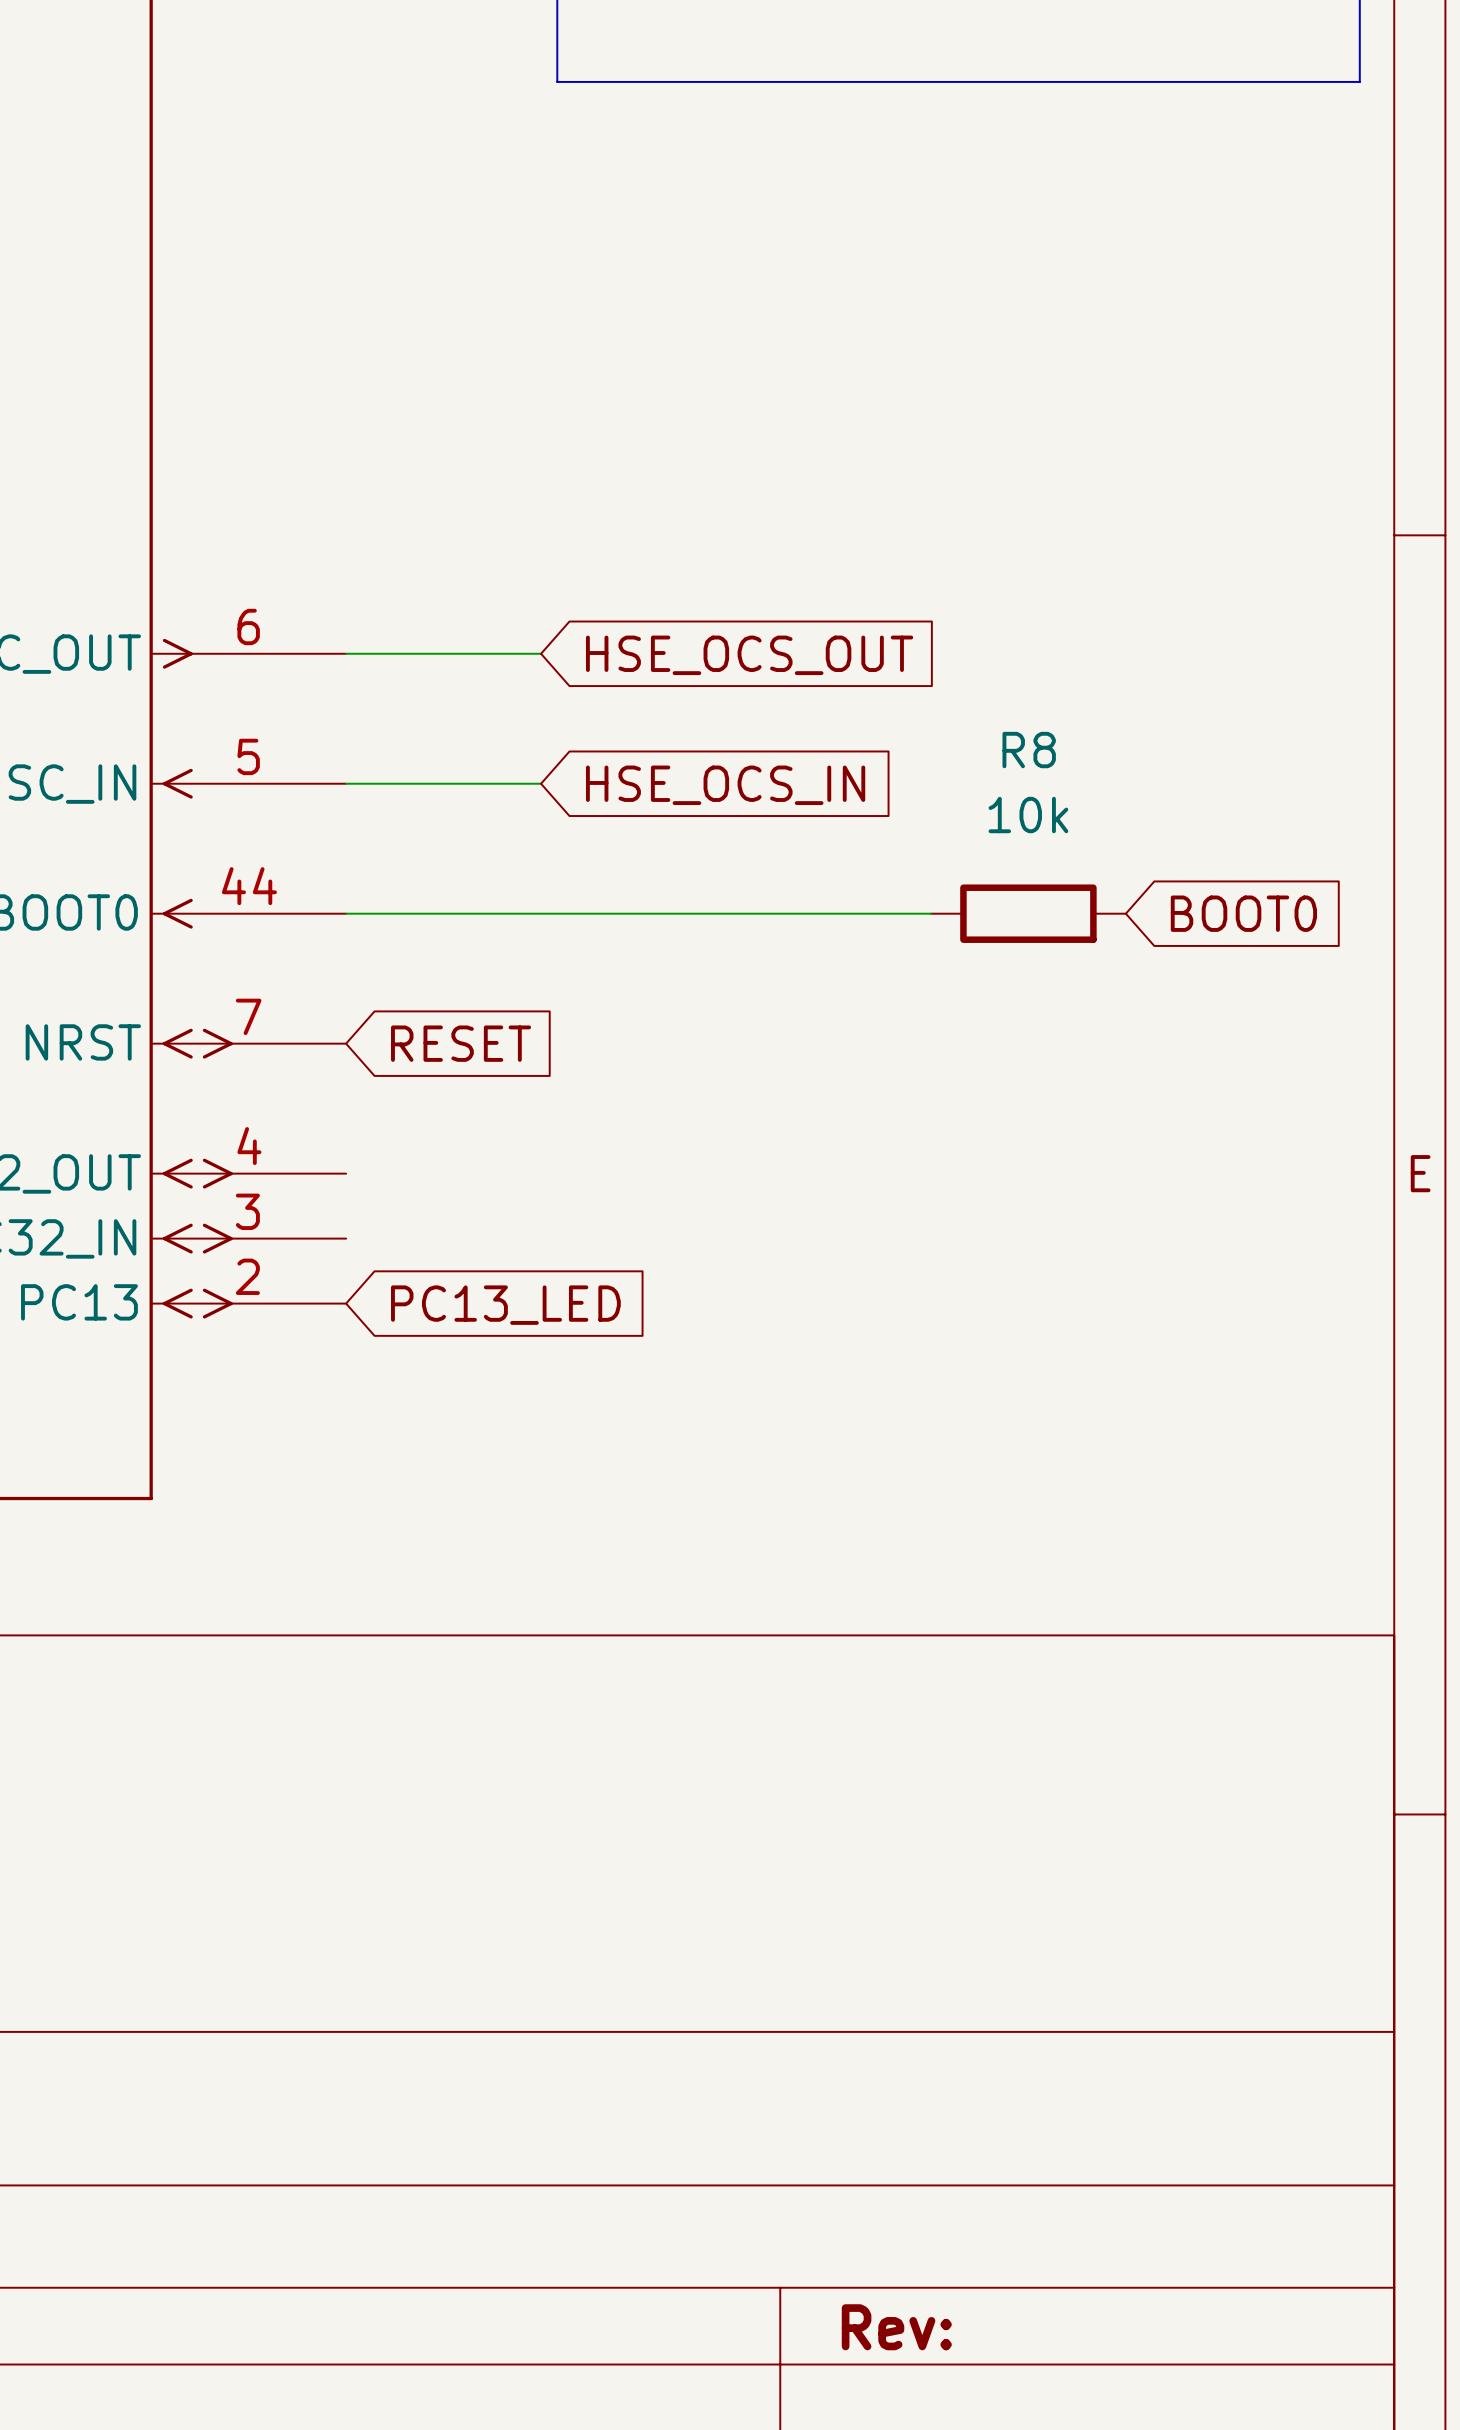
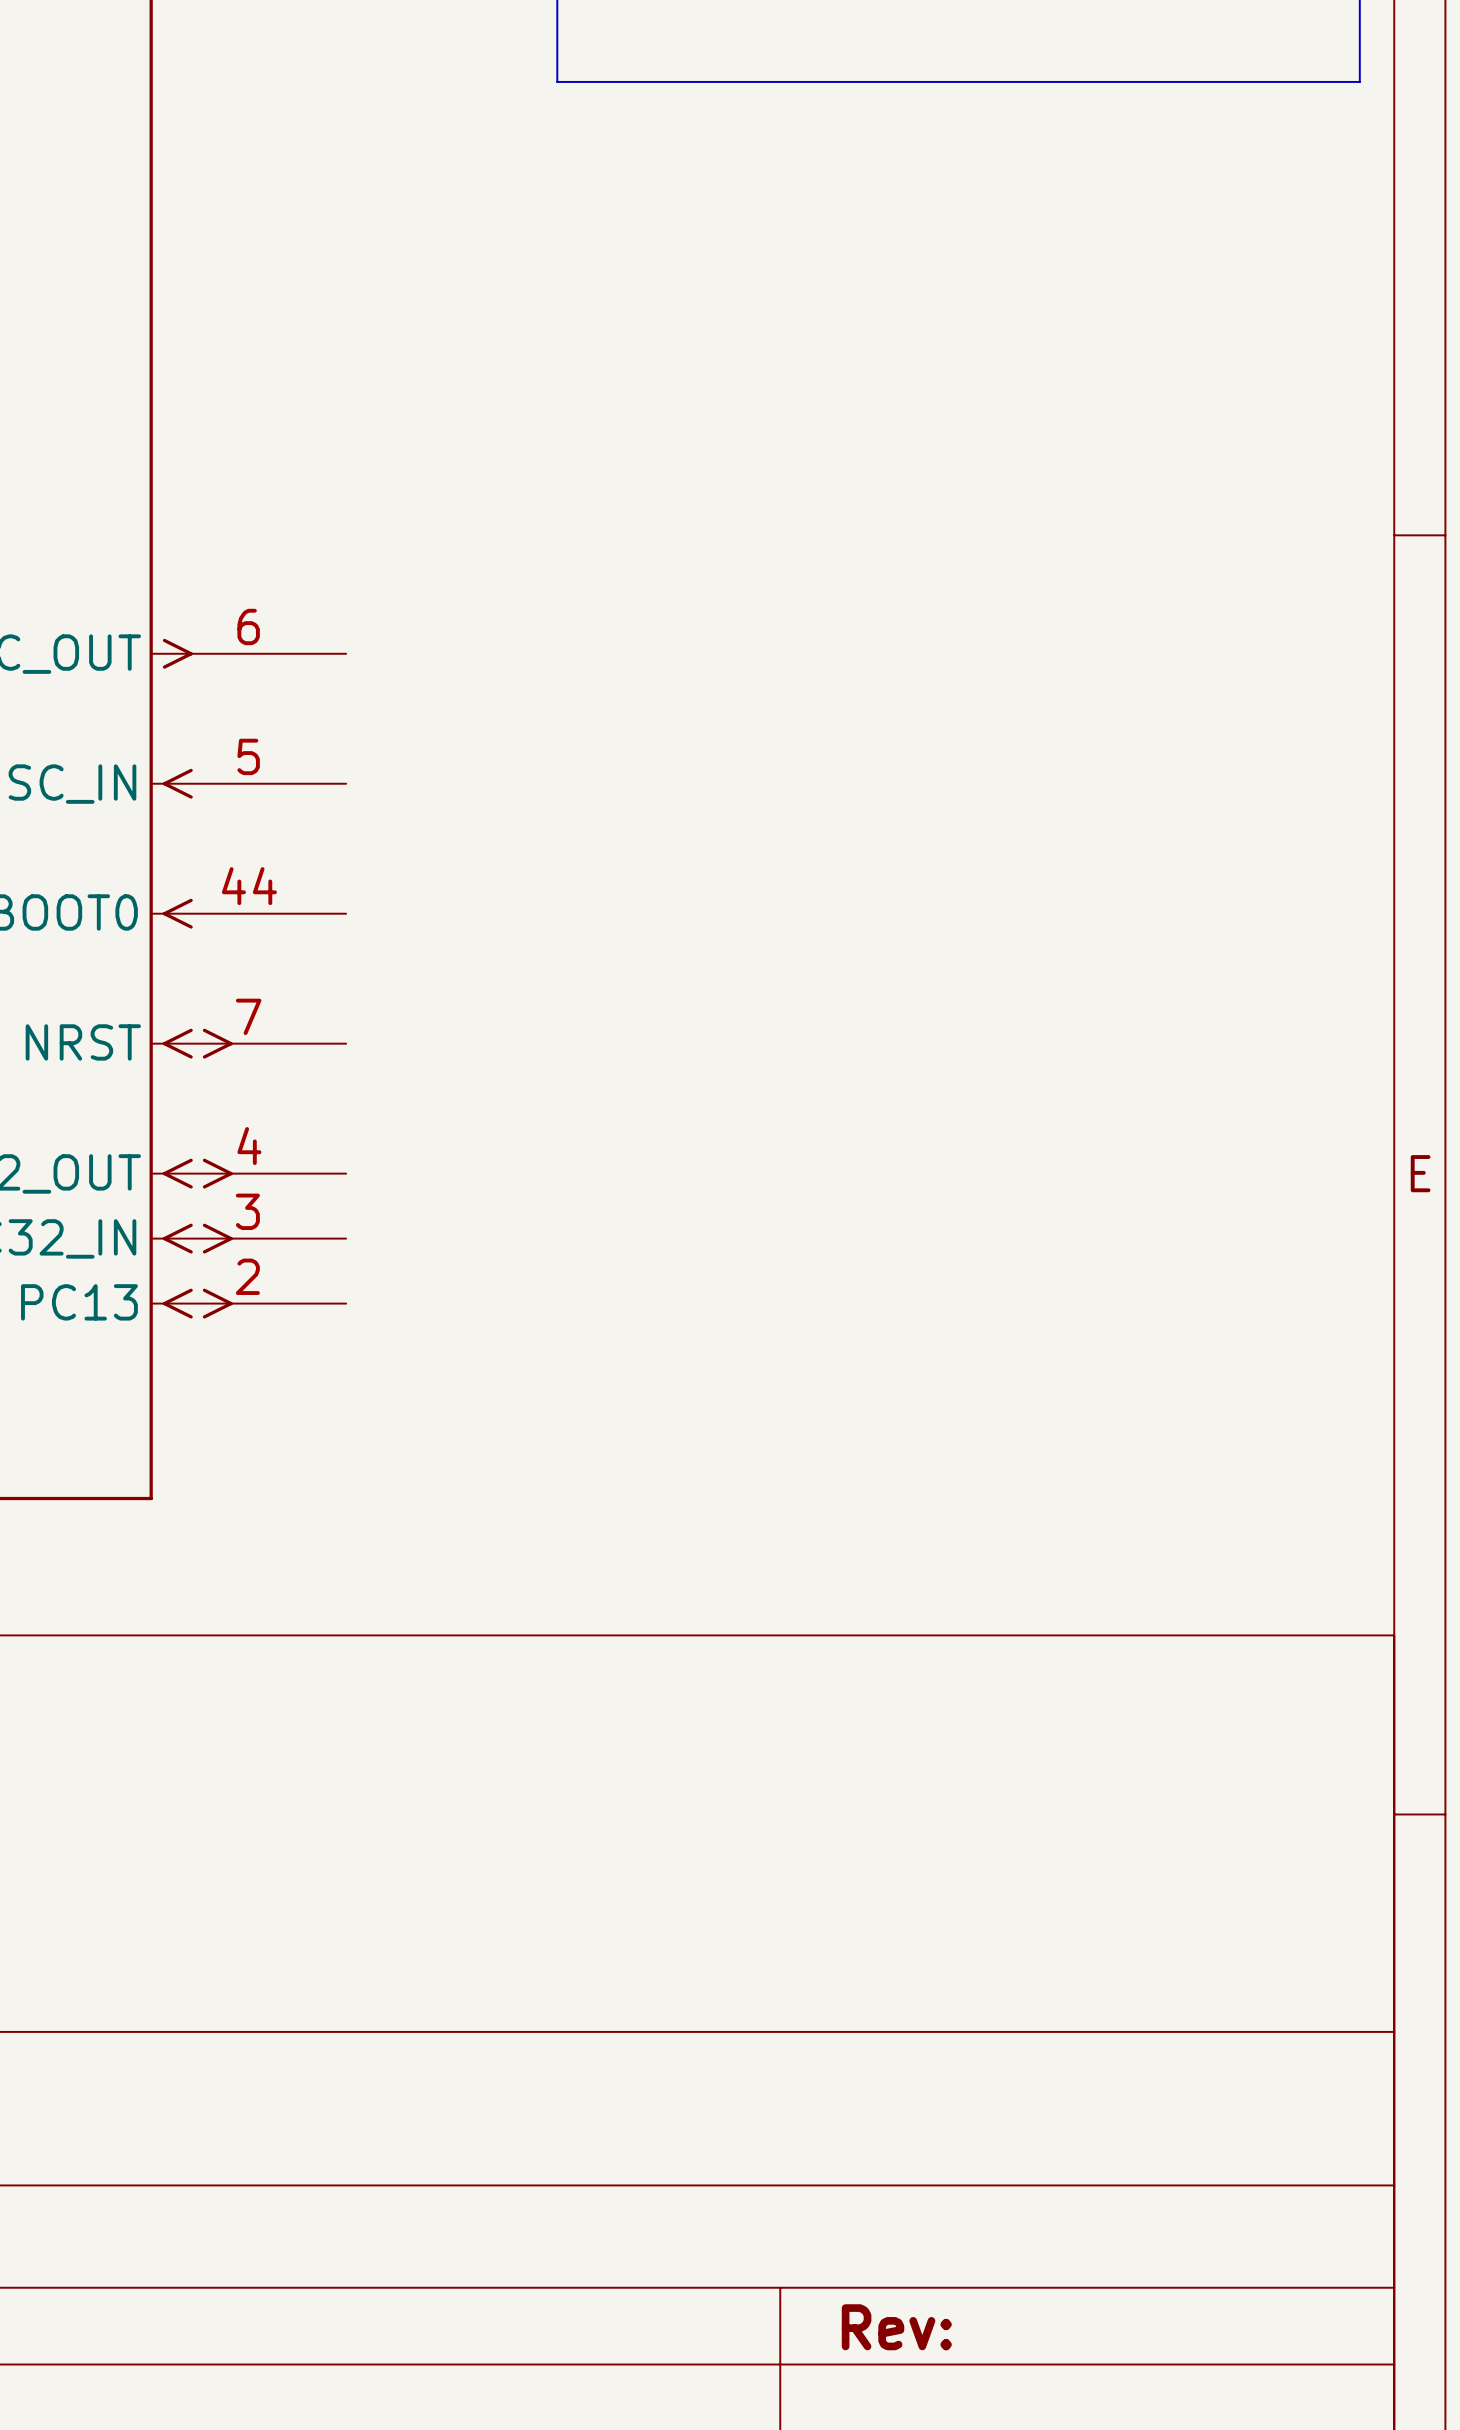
wire: (346, 653) (541, 653) -> none
global label: HSE_OCS_OUT (749, 655) -> none
wire: (346, 783) (541, 783) -> none
global label: HSE_OCS_IN (725, 785) -> none
wire: (346, 913) (930, 913) -> none
R8: 10k (1028, 913) -> none
global label: BOOT0 (1243, 913) -> none
global label: RESET (461, 1043) -> none
global label: PC13_LED (505, 1305) -> none

